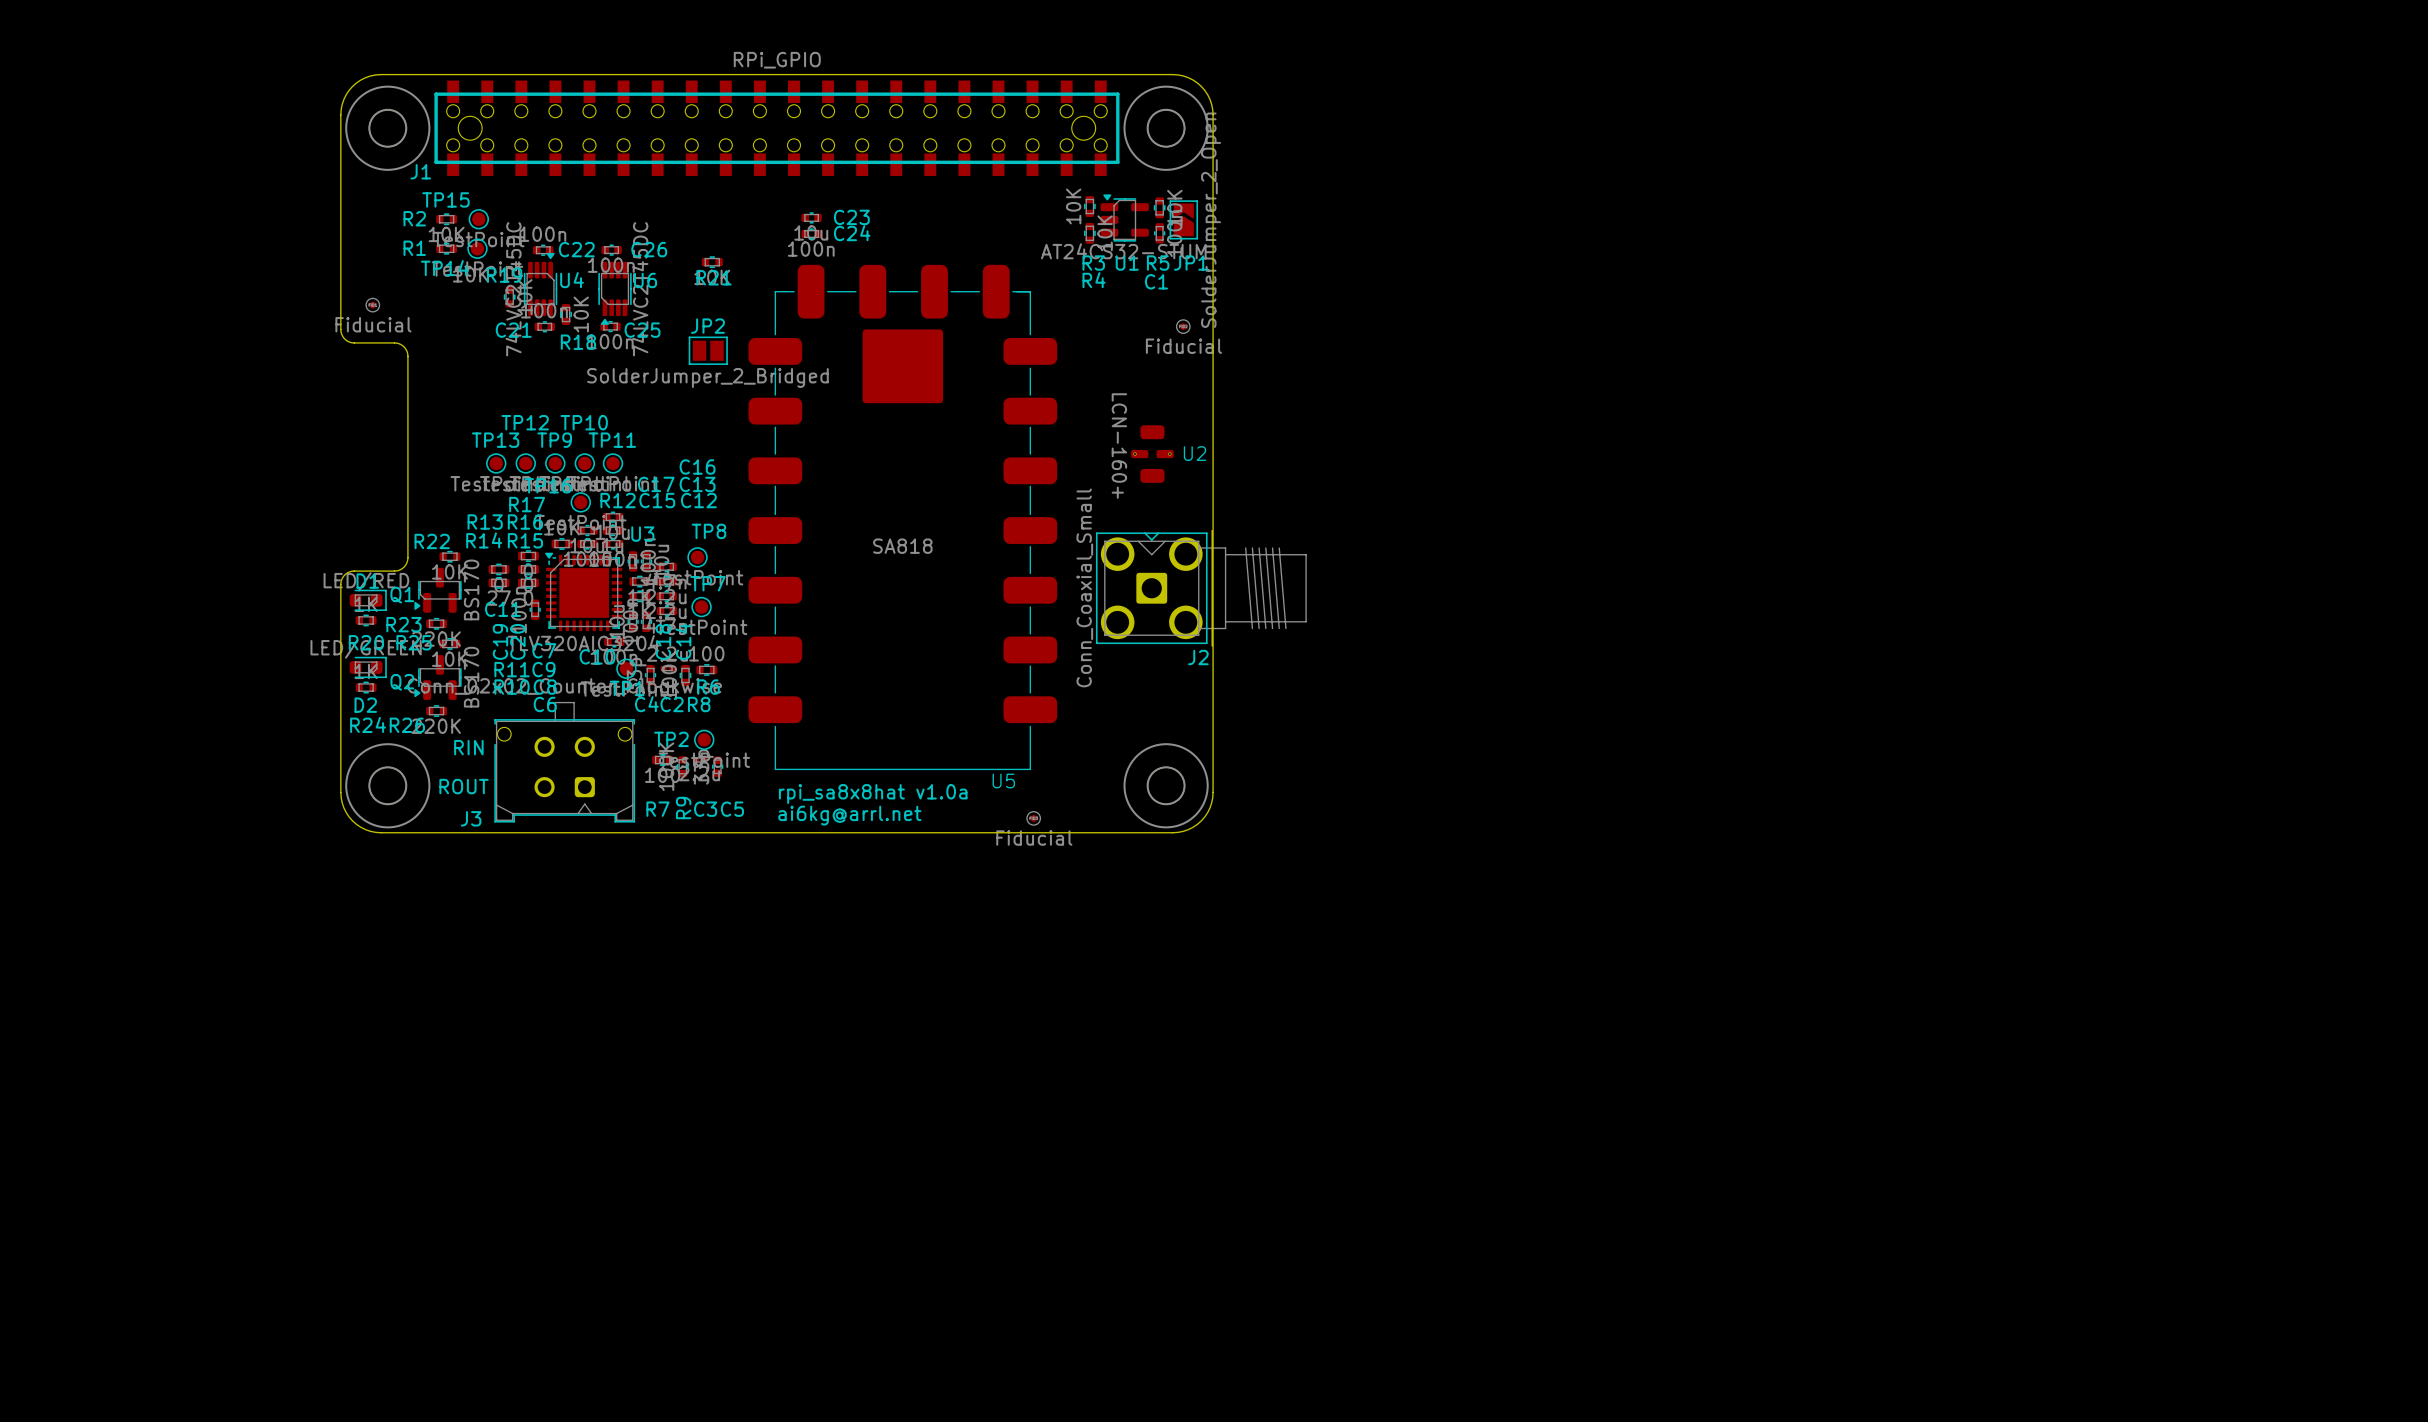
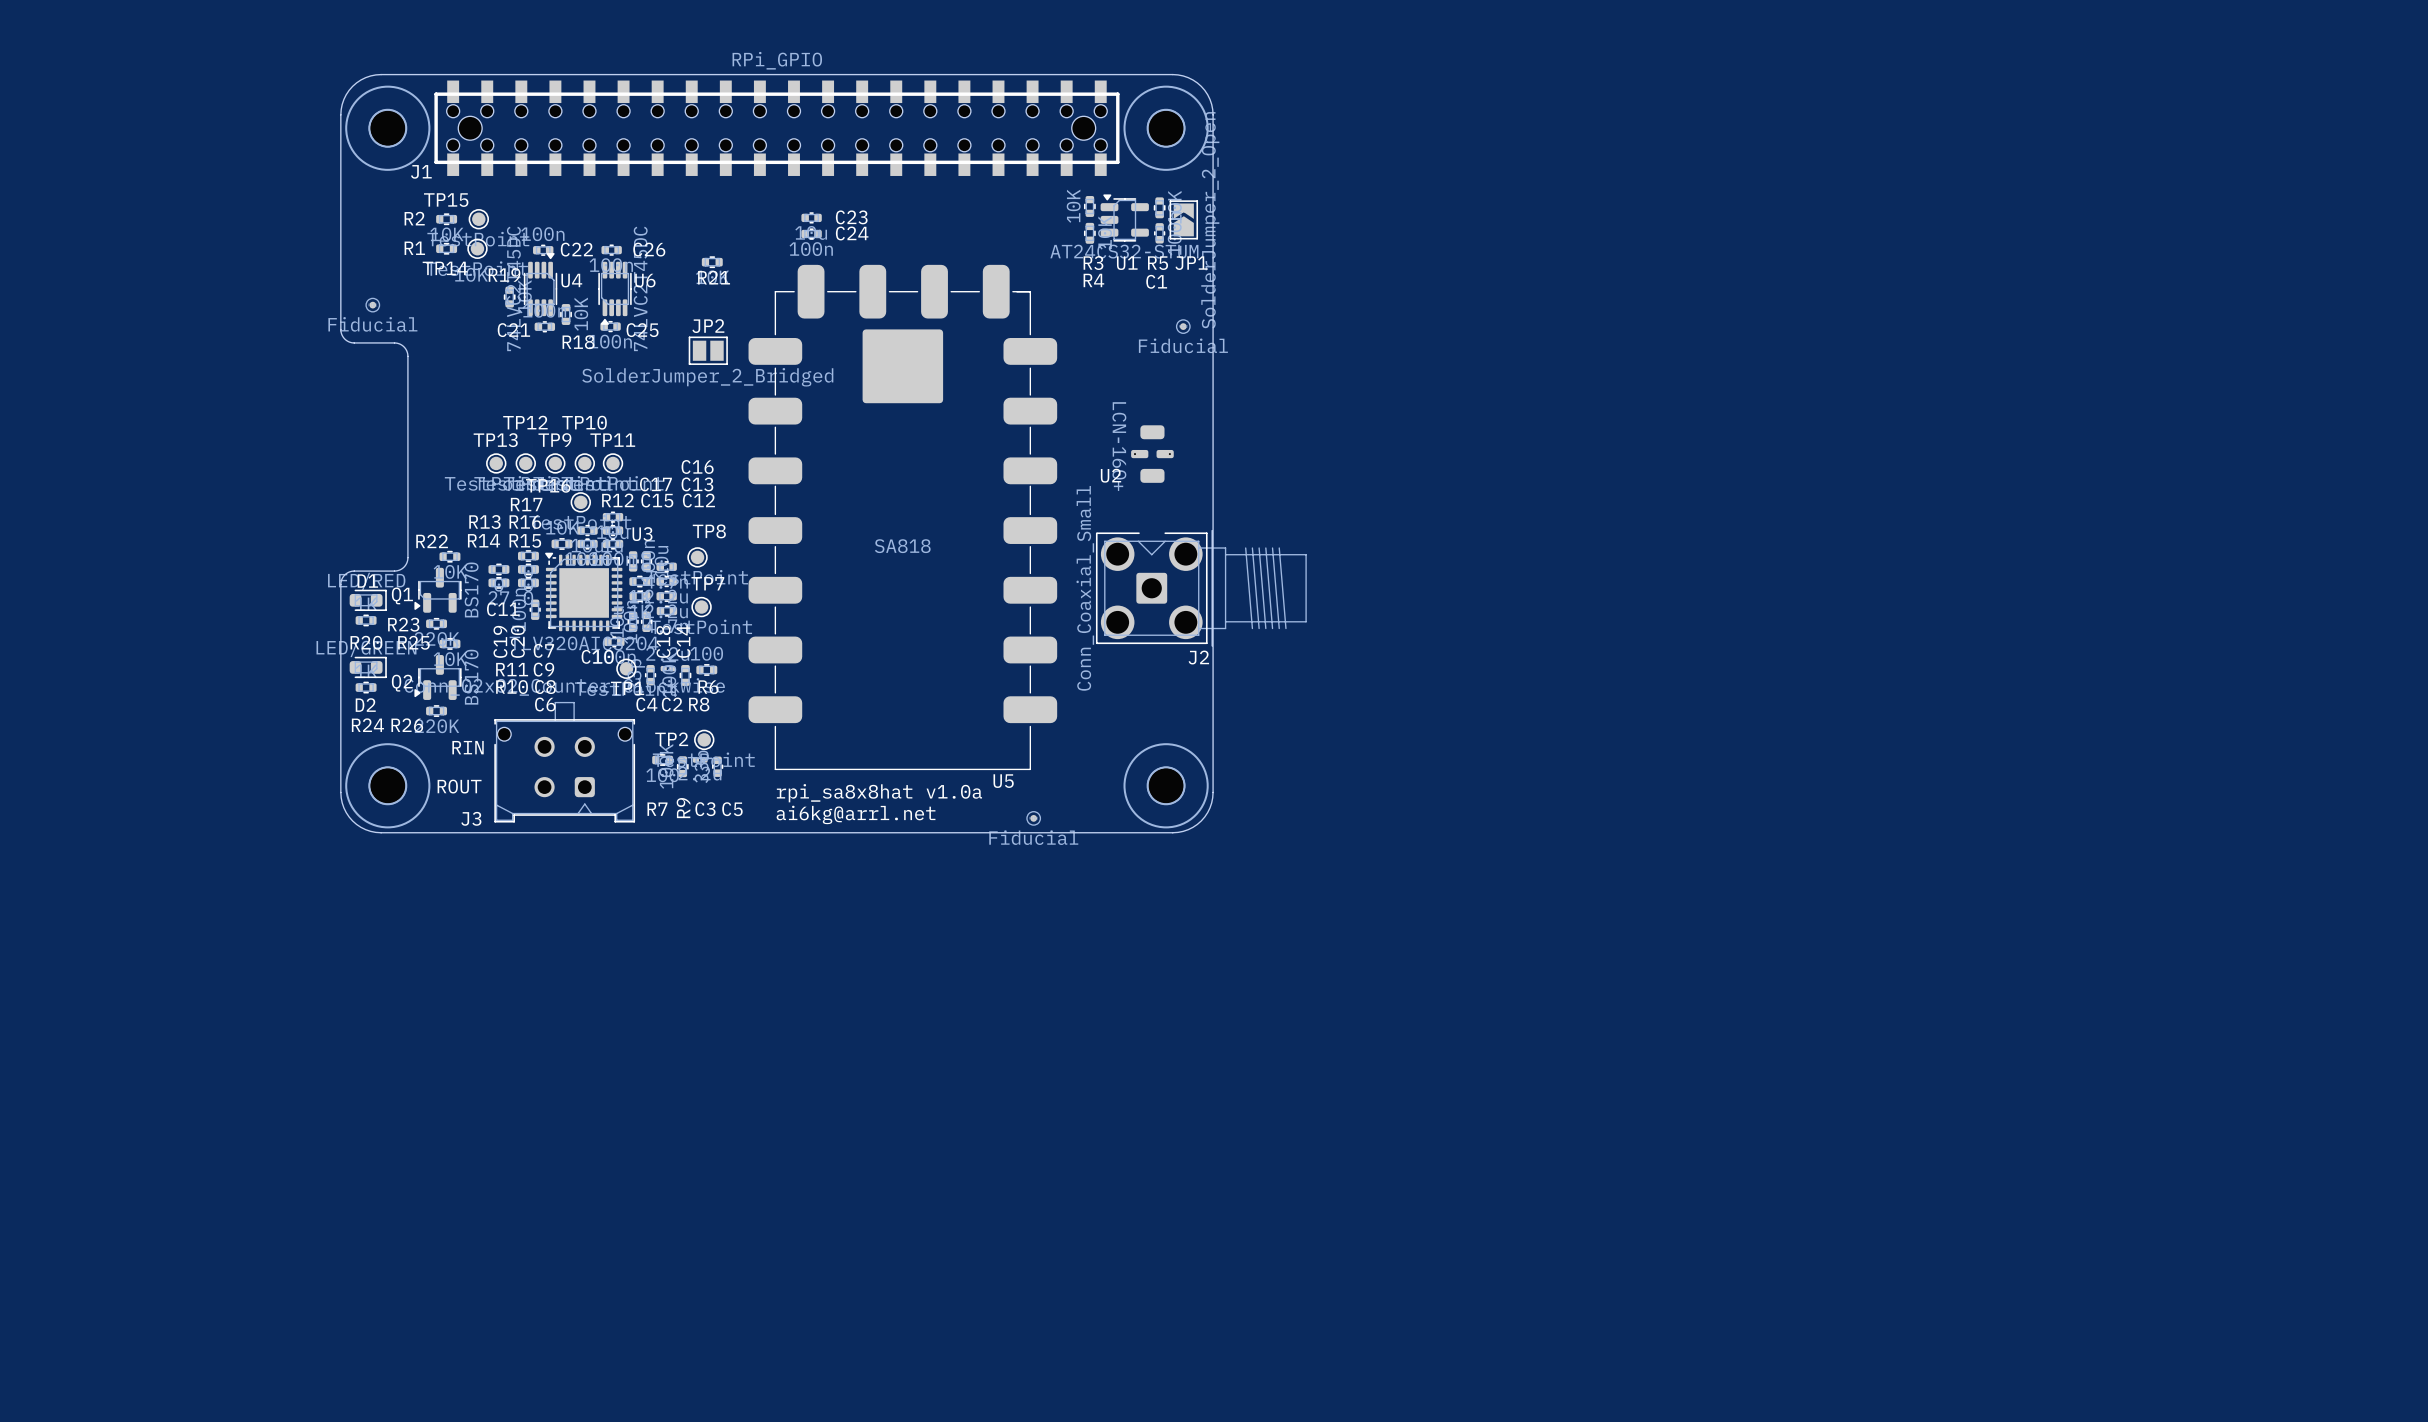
U2 name position: U2 (1195, 453) -> U2 (1111, 475)
J2 footprint: [1095, 529, 1307, 647] -> [1095, 529, 1307, 647]

